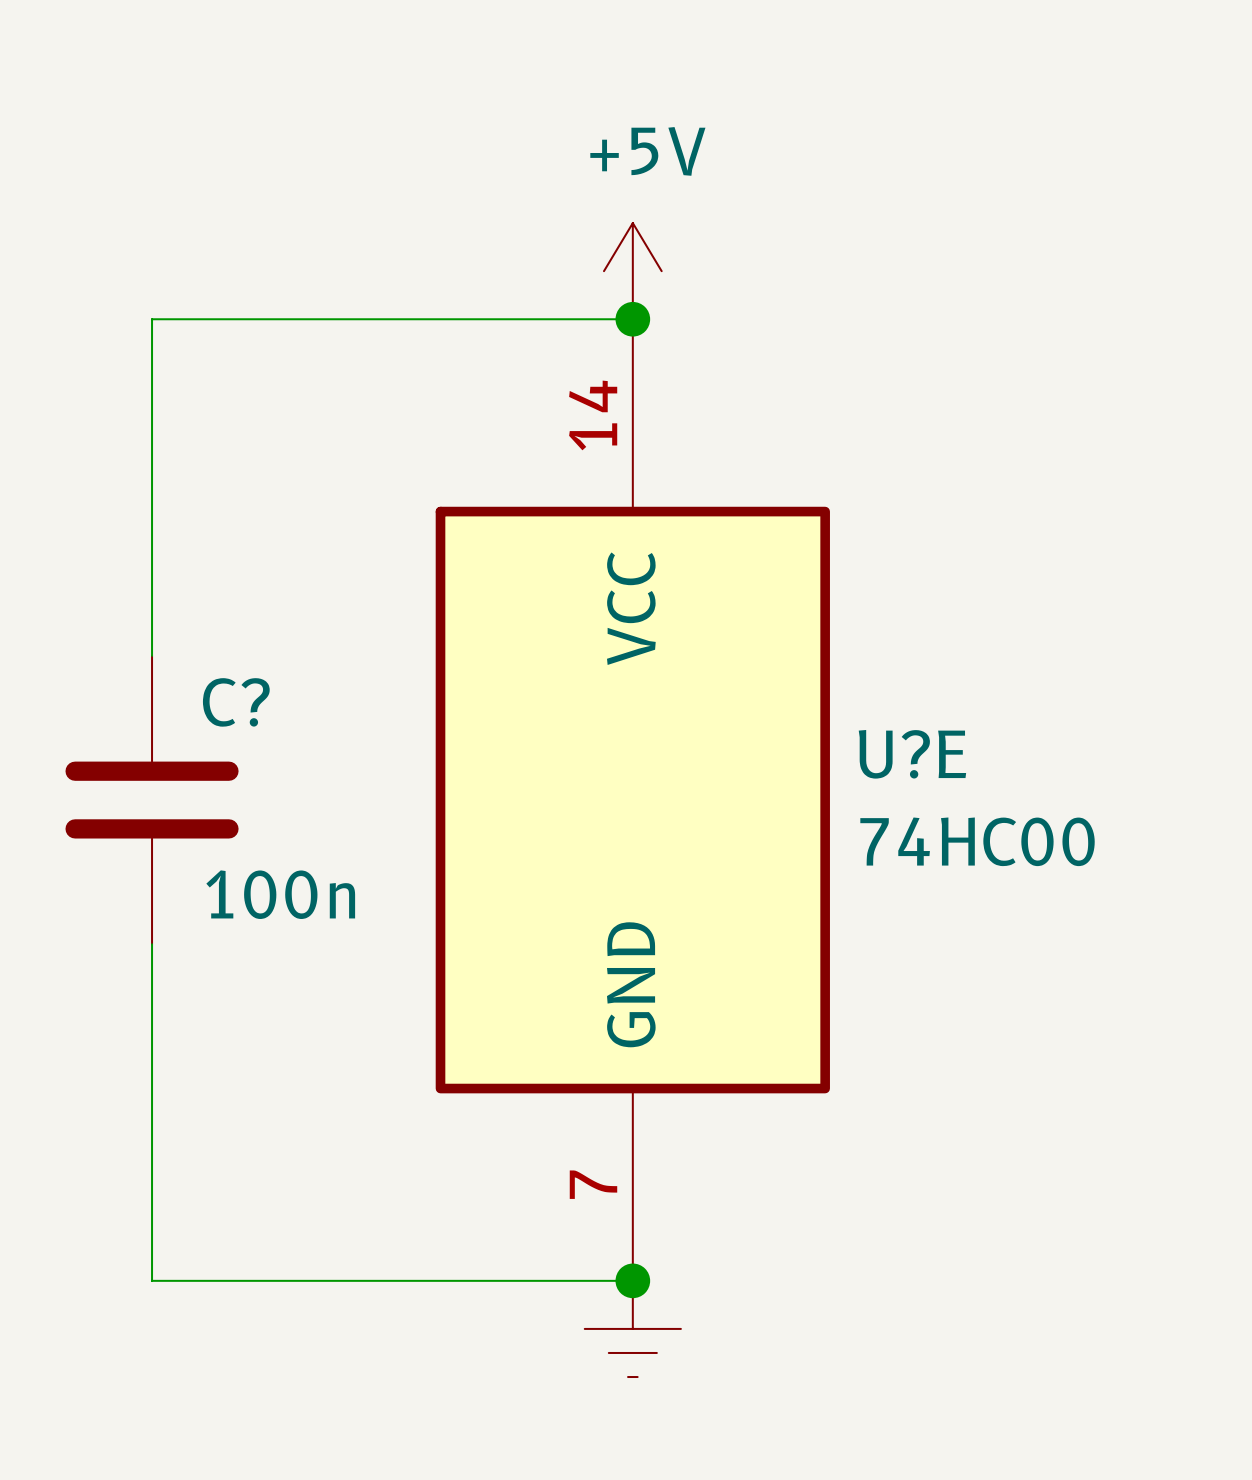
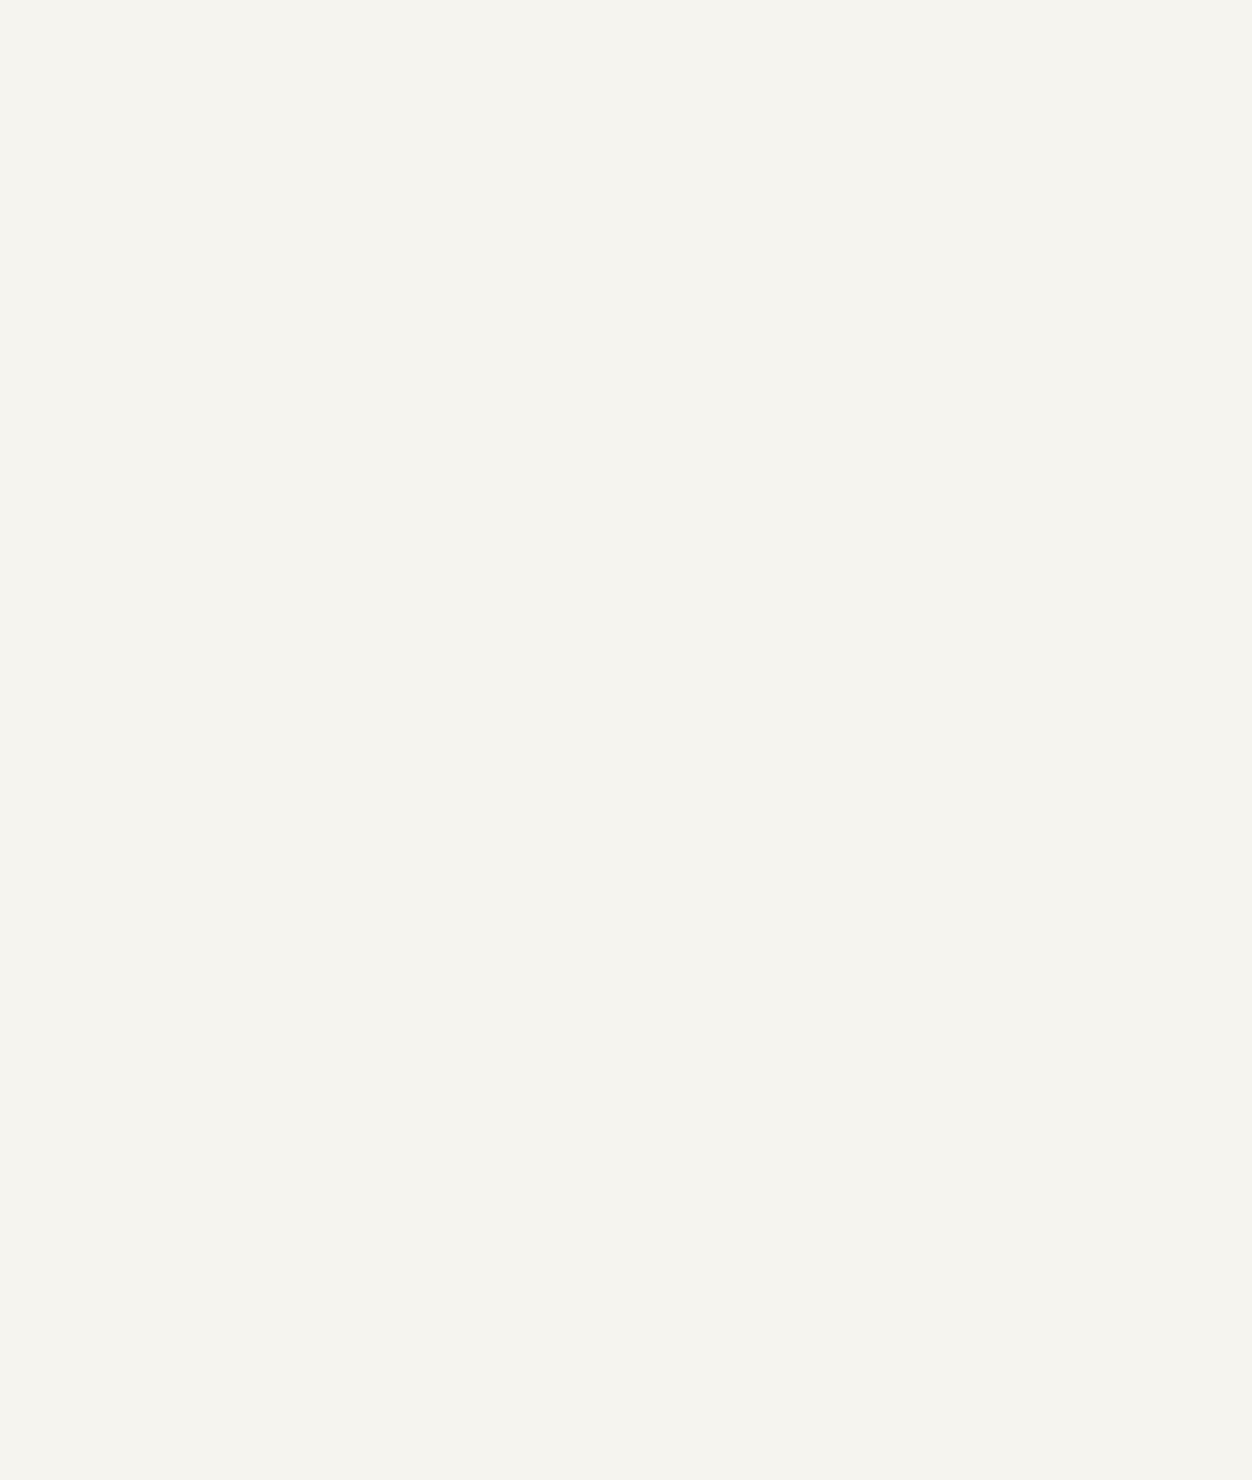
power symbol: +5V (632, 271) -> none
wire: (632, 319) (152, 319) (152, 655) -> none
junction: (632, 319) -> none
C?: 100n (152, 800) -> none
U?E: 74HC00 (632, 800) -> none
wire: (152, 944) (152, 1280) (632, 1280) -> none
junction: (632, 1280) -> none
power symbol: (632, 1328) -> none

